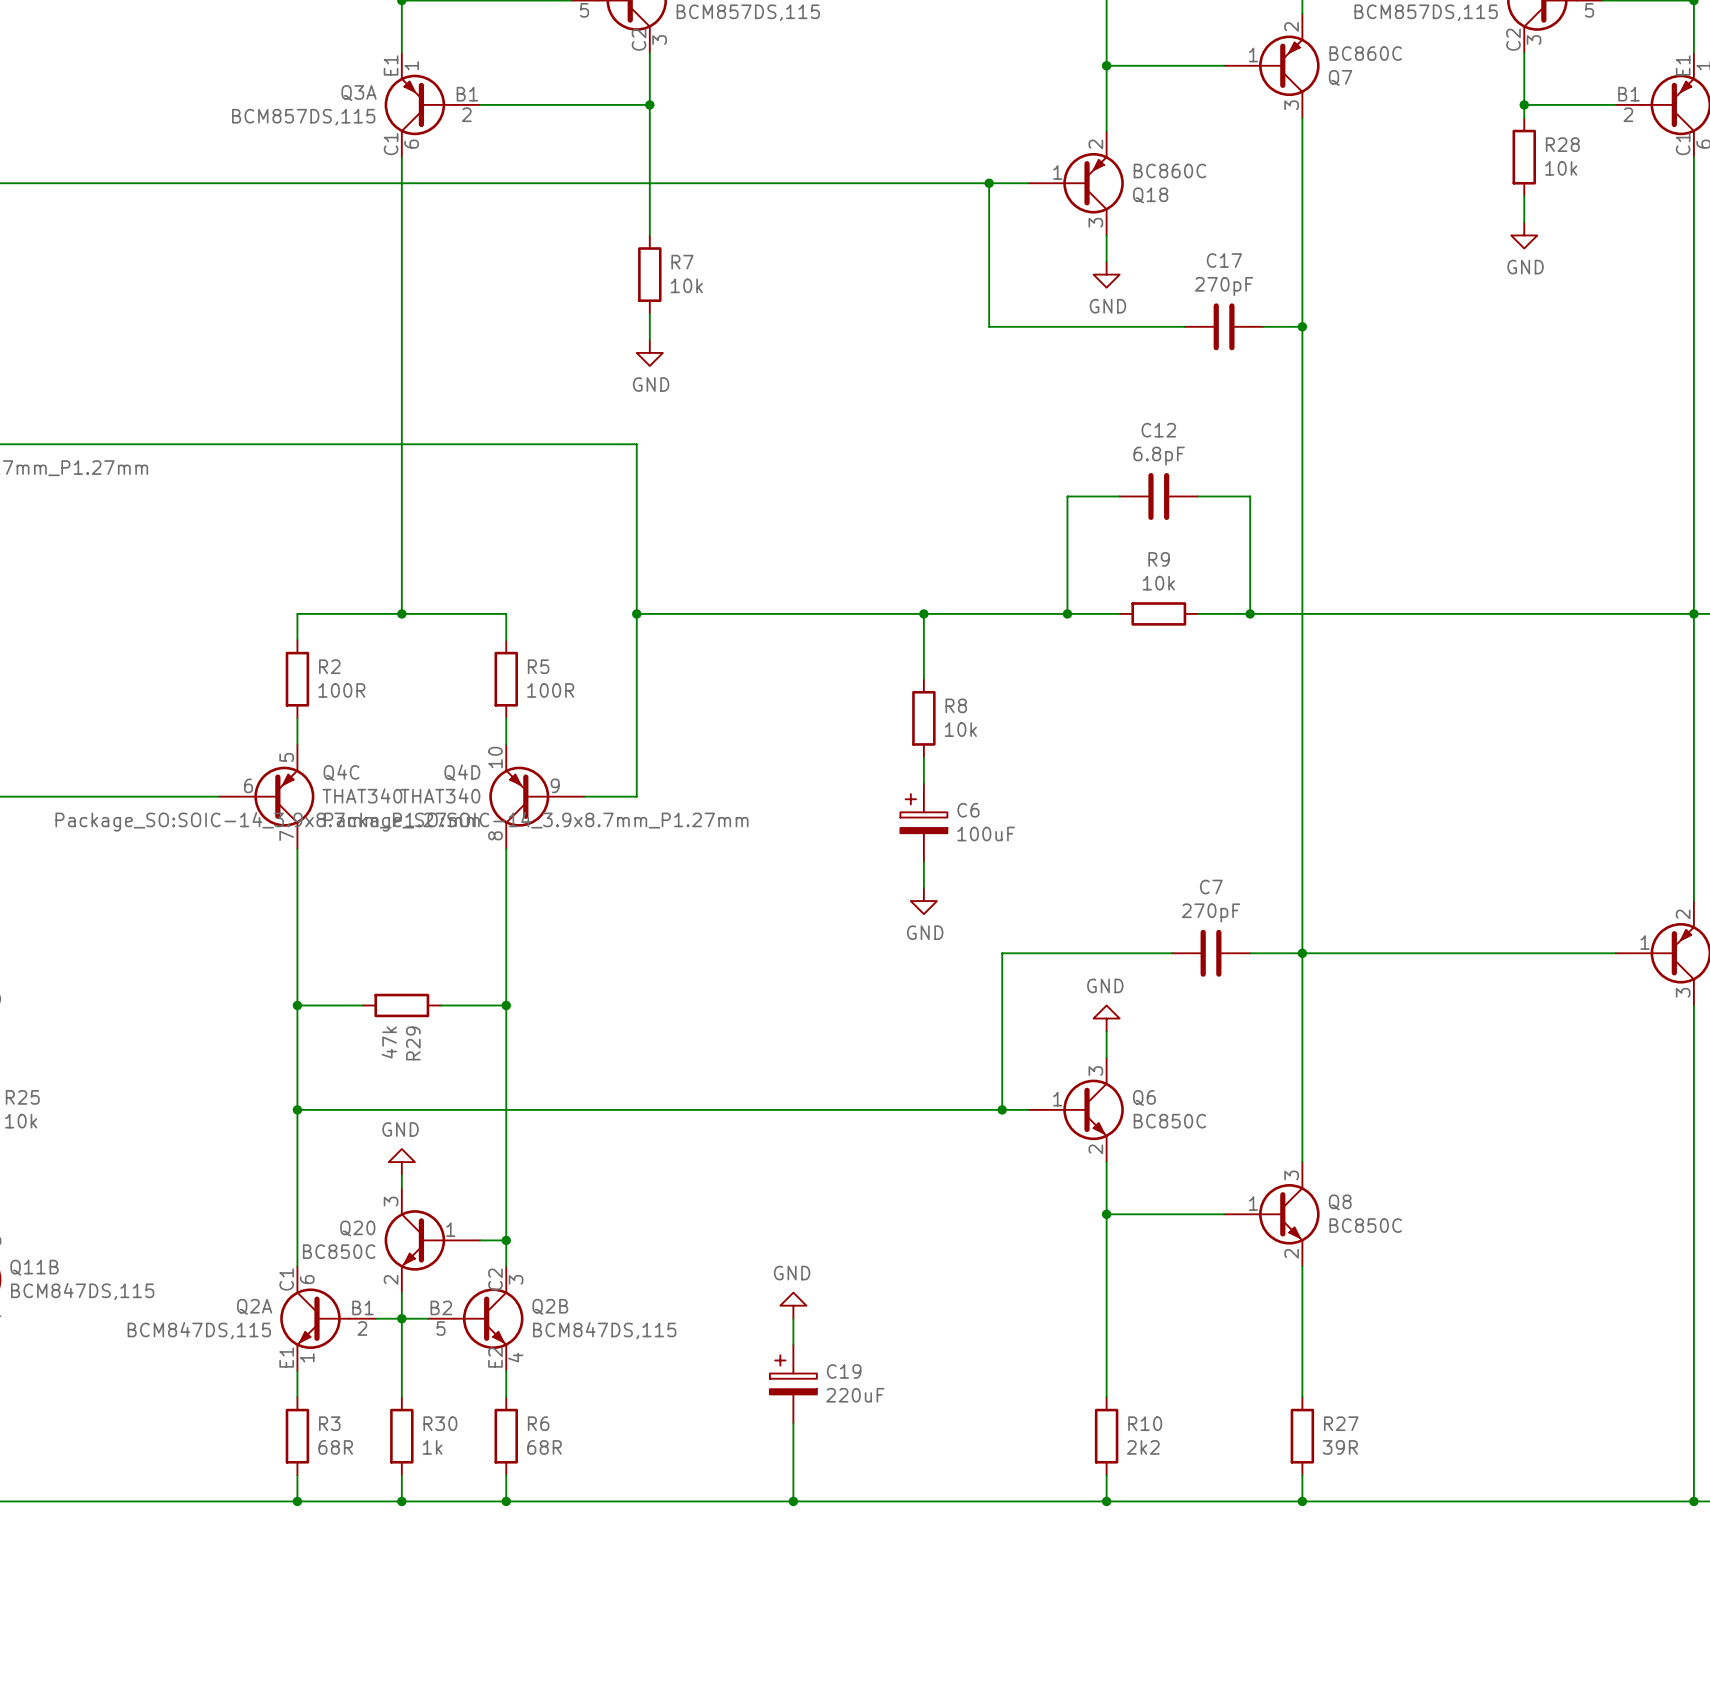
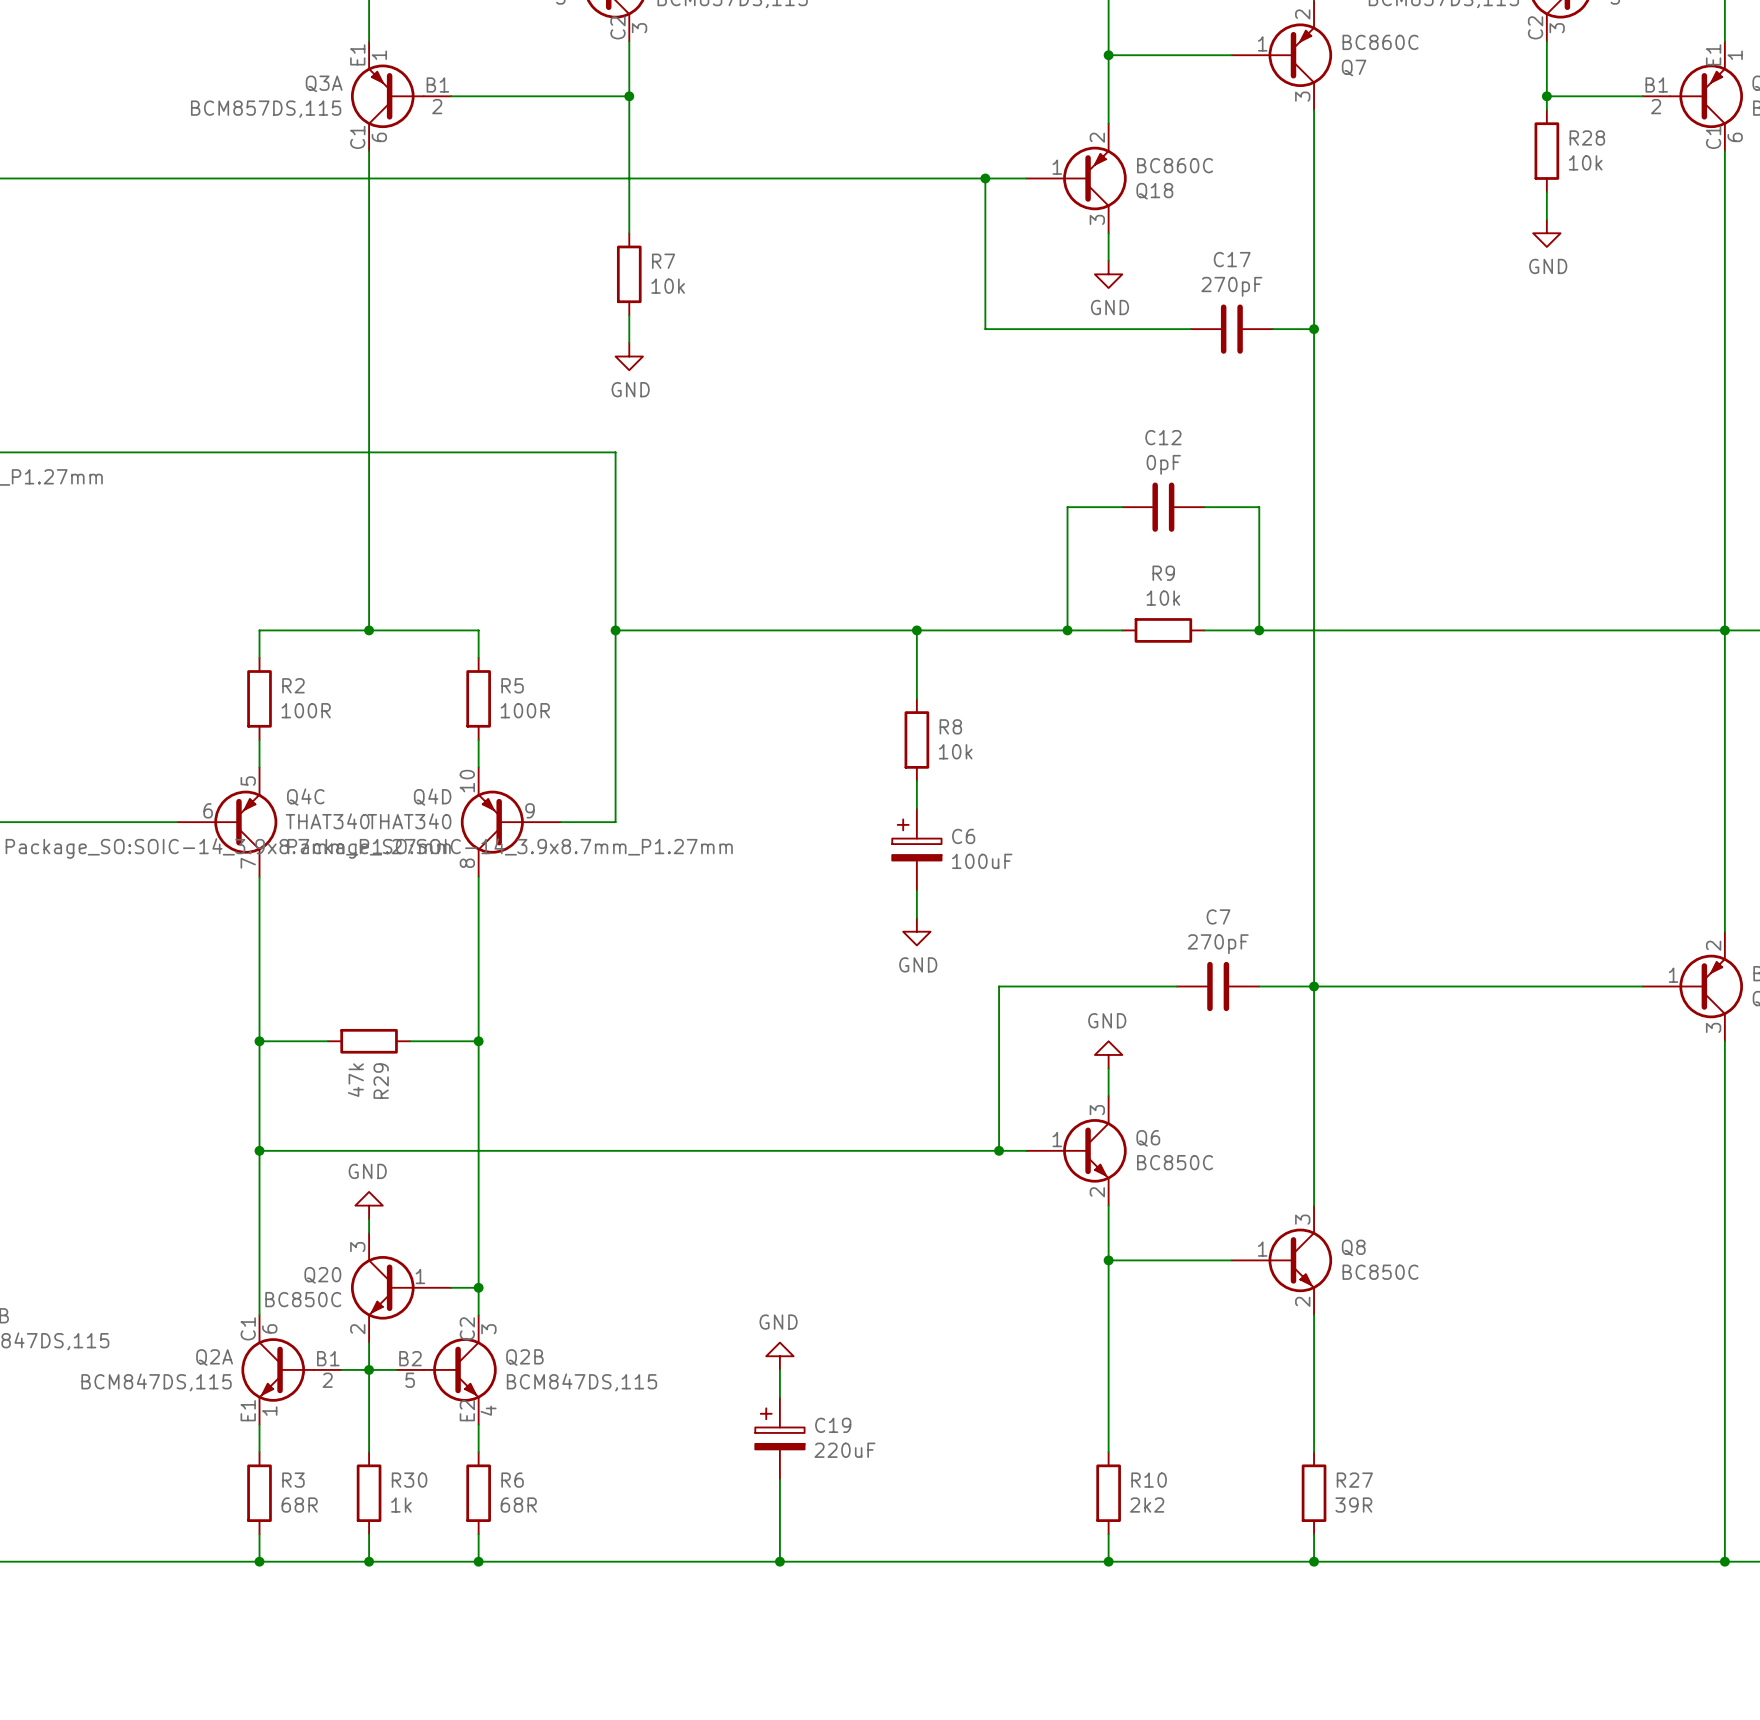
C12 value: 6.8pF (1159, 456) -> 0pF (1163, 464)

